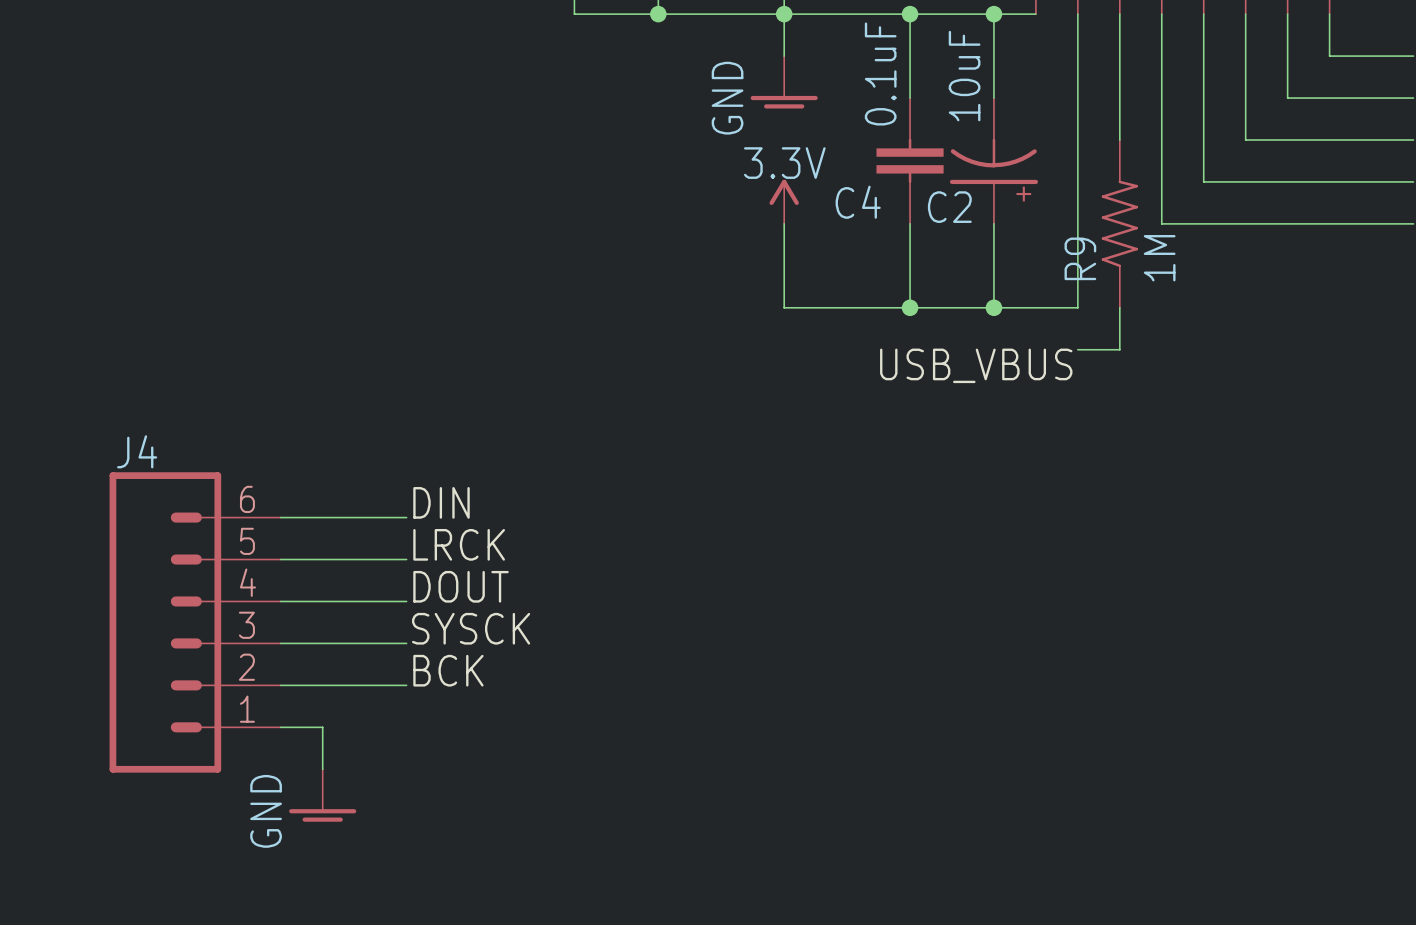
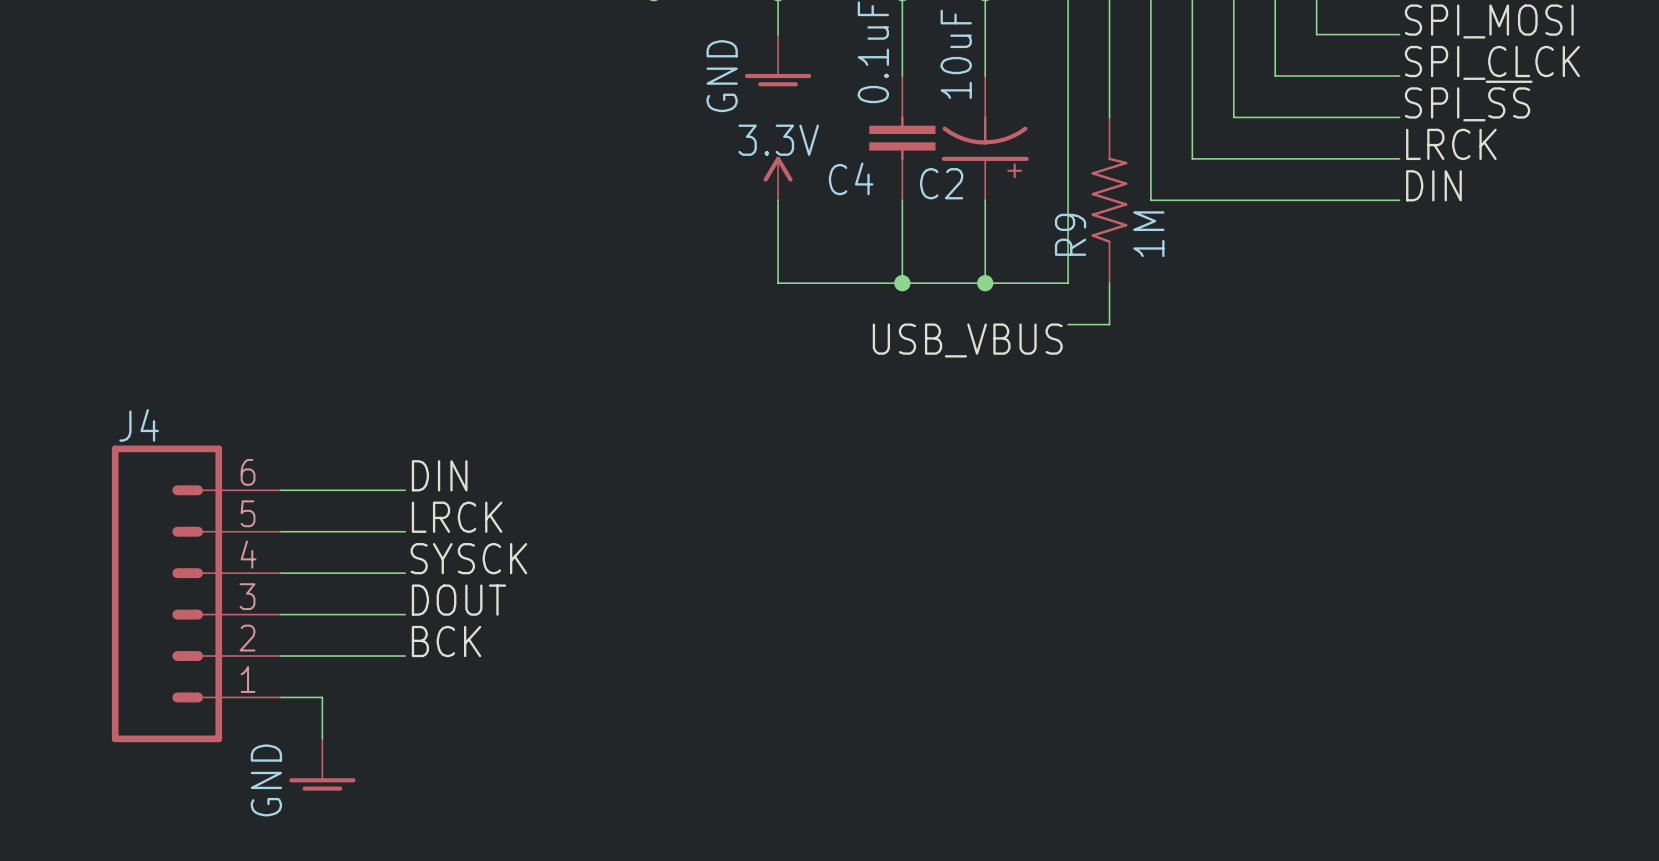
label: DOUT (461, 586) -> SYSCK (468, 558)
label: SYSCK (471, 628) -> DOUT (458, 600)

